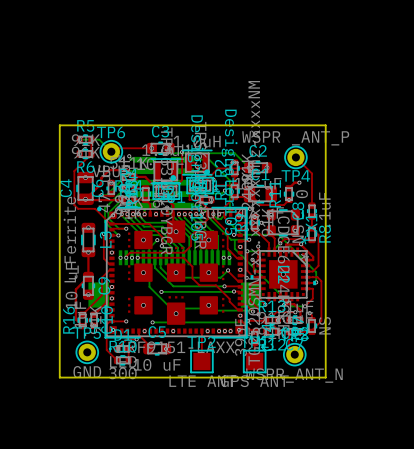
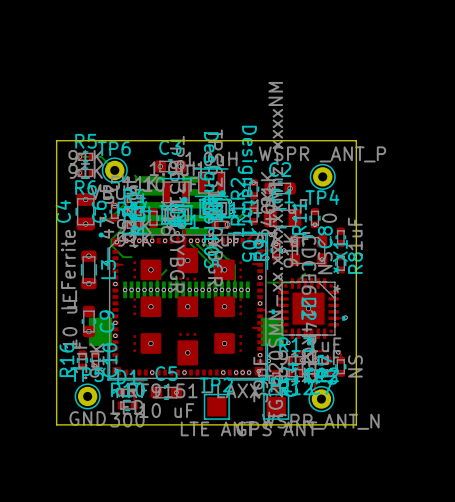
top track: (91, 139) (91, 154) (74, 171) (74, 205) (78, 208) (95, 208) (110, 223) (149, 223) (162, 237) (161, 245) -> none
top track: (151, 148) (114, 148) (111, 151) -> none
bottom track: (151, 148) (156, 153) (234, 153) (249, 167) -> none
top track: (182, 152) (182, 180) (173, 188) (173, 193) -> none
via: (182, 152) -> none
via: (129, 156) -> none
top track: (295, 157) (311, 173) (311, 205) -> none
bottom track: (182, 159) (209, 159) (229, 180) (229, 209) (220, 218) (217, 218) (213, 214) -> none
top track: (249, 167) (218, 168) (207, 179) (207, 187) -> none
bottom track: (144, 182) (130, 182) (104, 208) (104, 222) (118, 235) -> none
top track: (299, 182) (294, 182) (289, 188) -> none
via: (299, 182) -> none
top track: (193, 183) (189, 186) (189, 199) (200, 199) (207, 208) -> none
top track: (159, 188) (145, 176) (134, 176) (127, 170) (109, 170) (101, 178) (101, 183) (85, 199) (122, 199) -> none
via: (224, 190) -> none
top track: (134, 199) (145, 199) (150, 204) (150, 214) -> none
top track: (289, 199) (283, 205) (260, 205) (252, 197) (234, 197) (223, 208) (207, 208) -> none
bottom track: (182, 205) (199, 205) (207, 213) (207, 216) (231, 239) (249, 239) -> none
bottom track: (167, 207) (167, 210) (195, 238) (195, 257) -> none
top track: (207, 208) (207, 219) (191, 235) (191, 245) (184, 252) (130, 252) (126, 257) -> none
bottom track: (121, 214) (141, 235) (159, 235) (172, 247) (172, 257) -> none
bottom track: (127, 214) (142, 230) (161, 230) (177, 247) (177, 257) -> none
bottom track: (133, 214) (144, 226) (162, 226) (183, 247) (183, 257) -> none
bottom track: (138, 214) (145, 222) (174, 222) (189, 237) (189, 257) -> none
top track: (213, 214) (213, 218) (227, 232) (227, 248) (237, 258) (240, 258) -> none
top track: (224, 214) (224, 217) (229, 222) -> none
top track: (311, 216) (311, 228) (318, 234) (318, 265) (312, 271) (305, 271) -> none
bottom track: (229, 222) (241, 234) (278, 234) (316, 272) (316, 282) -> none
via: (229, 222) -> none
top track: (126, 228) (111, 229) -> none
via: (126, 228) -> none
top track: (254, 228) (268, 242) (268, 252) -> none
top track: (271, 230) (271, 235) (274, 238) (274, 252) -> none
top track: (103, 233) (103, 258) (111, 264) -> none
via: (233, 234) -> none
via: (118, 235) -> none
bottom track: (234, 239) (234, 248) (292, 306) (305, 306) -> none
top track: (249, 239) (240, 241) -> none
via: (249, 239) -> none
via: (157, 240) -> none
top track: (311, 240) (284, 239) (280, 243) -> none
via: (280, 243) -> none
top track: (300, 244) (286, 244) (286, 252) -> none
top track: (301, 244) (313, 256) (313, 260) (305, 260) -> none
via: (301, 244) -> none
via: (161, 245) -> none
top track: (247, 251) (247, 270) (253, 277) (261, 277) -> none
via: (247, 251) -> none
top track: (88, 252) (88, 276) (75, 289) (75, 319) (82, 326) (106, 302) (106, 295) (111, 292) -> none
top track: (137, 257) (183, 257) (192, 266) (192, 278) (199, 285) (216, 285) (229, 298) (229, 301) (240, 309) -> none
bottom track: (143, 257) (143, 264) (149, 270) (149, 286) (171, 308) (252, 311) -> none
via: none -> (150, 289)
via: none -> (157, 289)
bottom track: (154, 257) (154, 267) (173, 286) (224, 286) -> none
via: none -> (163, 289)
bottom track: (160, 257) (160, 267) (170, 277) (220, 277) (228, 270) -> none
via: none -> (170, 289)
via: none -> (189, 289)
via: none -> (196, 289)
via: none -> (202, 289)
via: none -> (209, 289)
via: none -> (215, 289)
via: none -> (221, 289)
via: none -> (228, 289)
via: none -> (234, 289)
top track: (252, 259) (253, 271) (261, 271) -> none
via: (252, 259) -> none
top track: (111, 269) (101, 277) (101, 295) (82, 314) -> none
top track: (228, 270) (240, 281) -> none
via: (228, 270) -> none
via: (246, 277) -> none
top track: (305, 277) (317, 277) (321, 281) (321, 320) (310, 331) -> none
top track: (261, 282) (253, 282) (250, 286) (250, 300) (258, 308) (258, 314) -> none
top track: (224, 286) (240, 287) -> none
via: (224, 286) -> none
top track: (261, 288) (253, 288) (253, 293) (265, 304) -> none
top track: (305, 288) (312, 288) (312, 298) (305, 306) -> none
via: (161, 291) -> none
bottom track: (234, 291) (161, 291) -> none
via: (234, 291) -> none
top track: (240, 304) (245, 304) (252, 311) -> none
top track: (283, 305) (294, 304) (300, 310) (300, 320) -> none
via: (305, 306) -> none
via: (252, 311) -> none
via: (295, 312) -> none
top track: (247, 320) (266, 320) -> none
bottom track: (247, 320) (246, 322) (152, 322) -> none
top track: (126, 321) (109, 321) (106, 324) (106, 350) (116, 360) -> none
via: (126, 321) -> none
via: (152, 322) -> none
top track: (138, 331) (138, 335) (148, 344) (148, 348) -> none
top track: (201, 331) (201, 361) -> none
via: (136, 339) -> none

